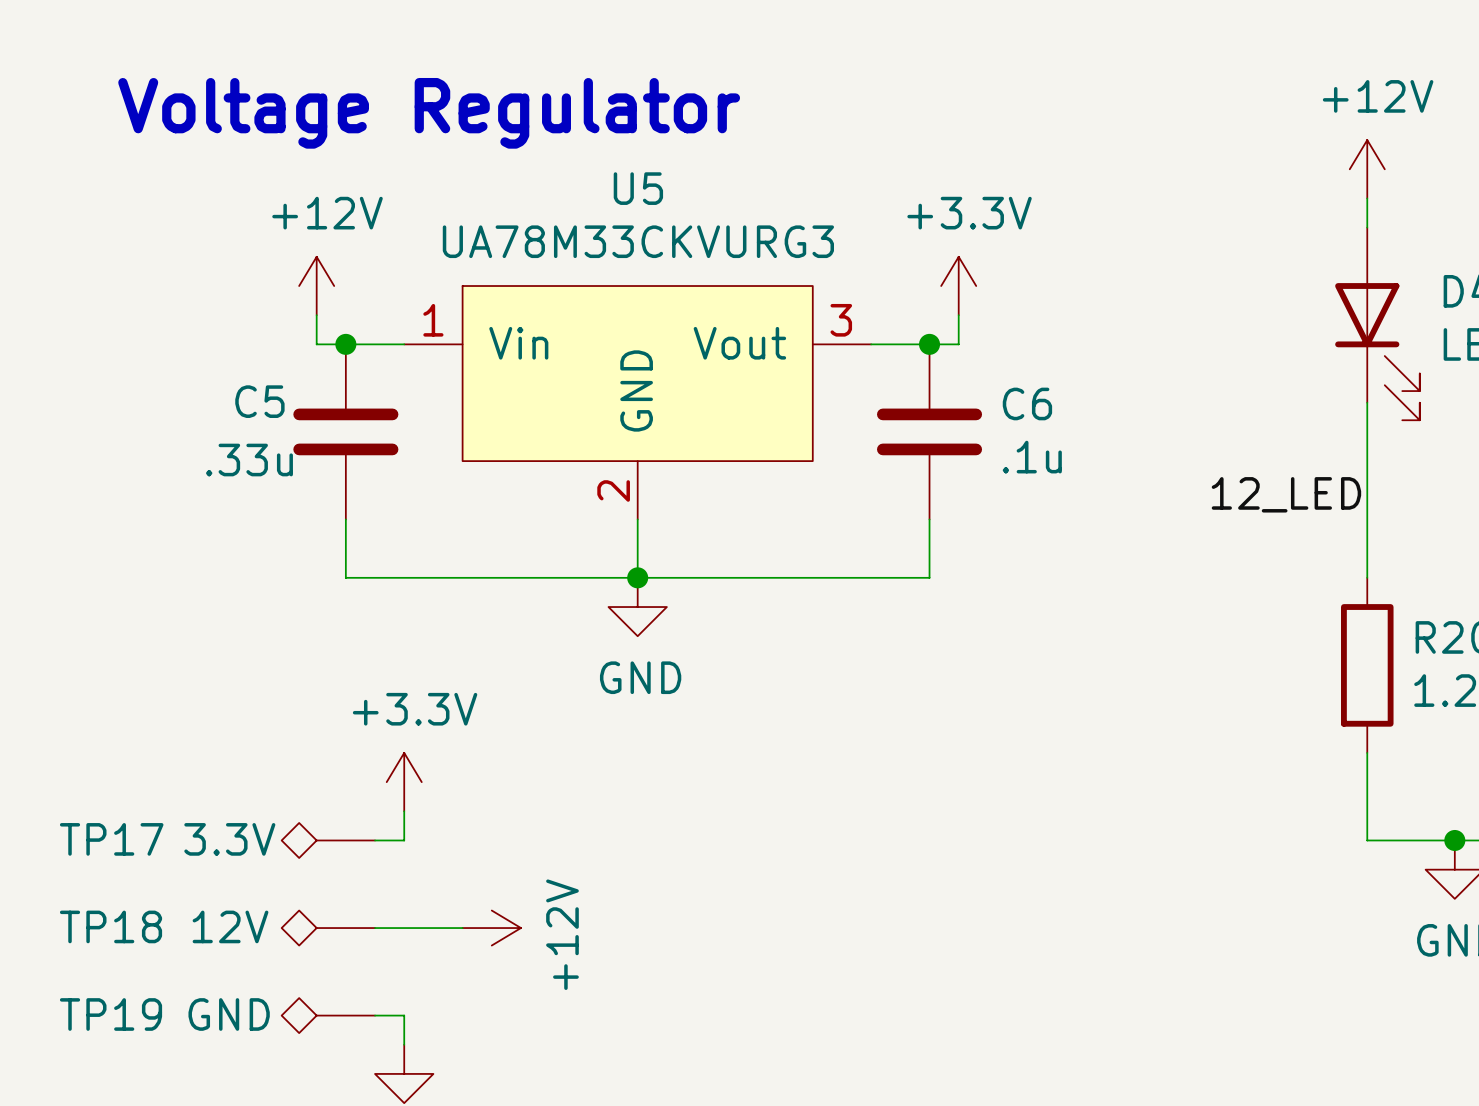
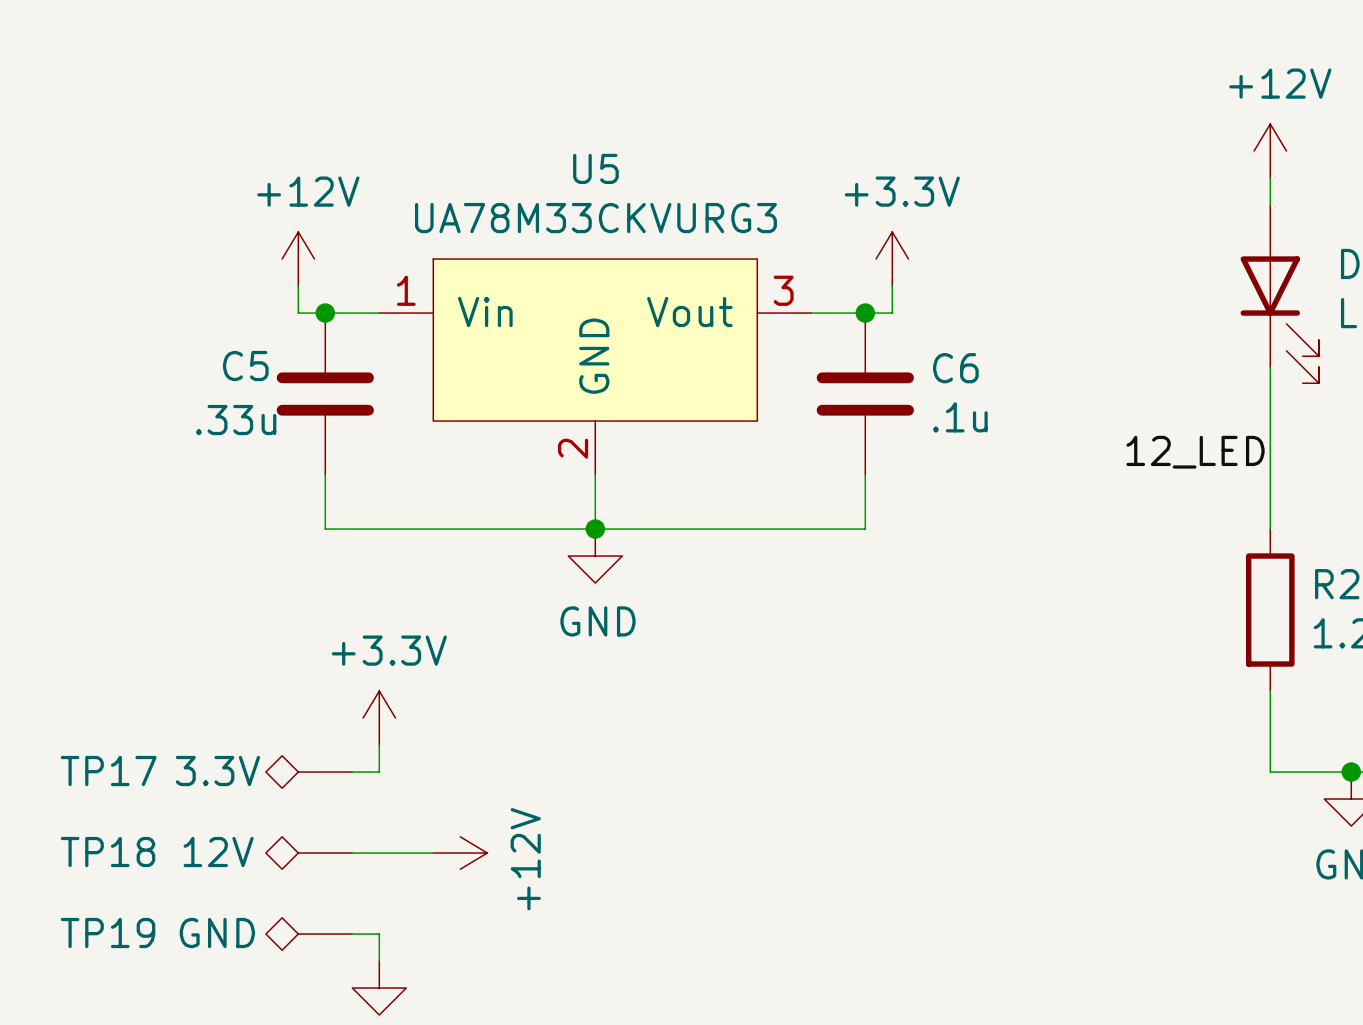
text: Voltage Regulator (429, 113) -> none

